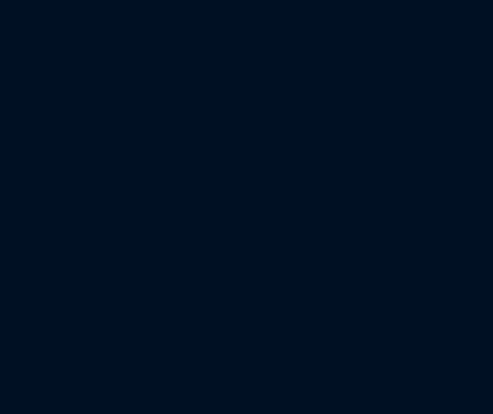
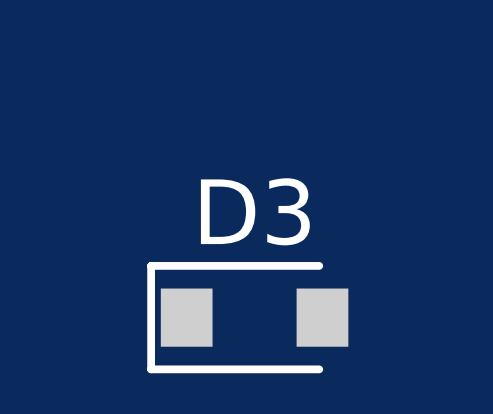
D3: none -> (247, 317)

